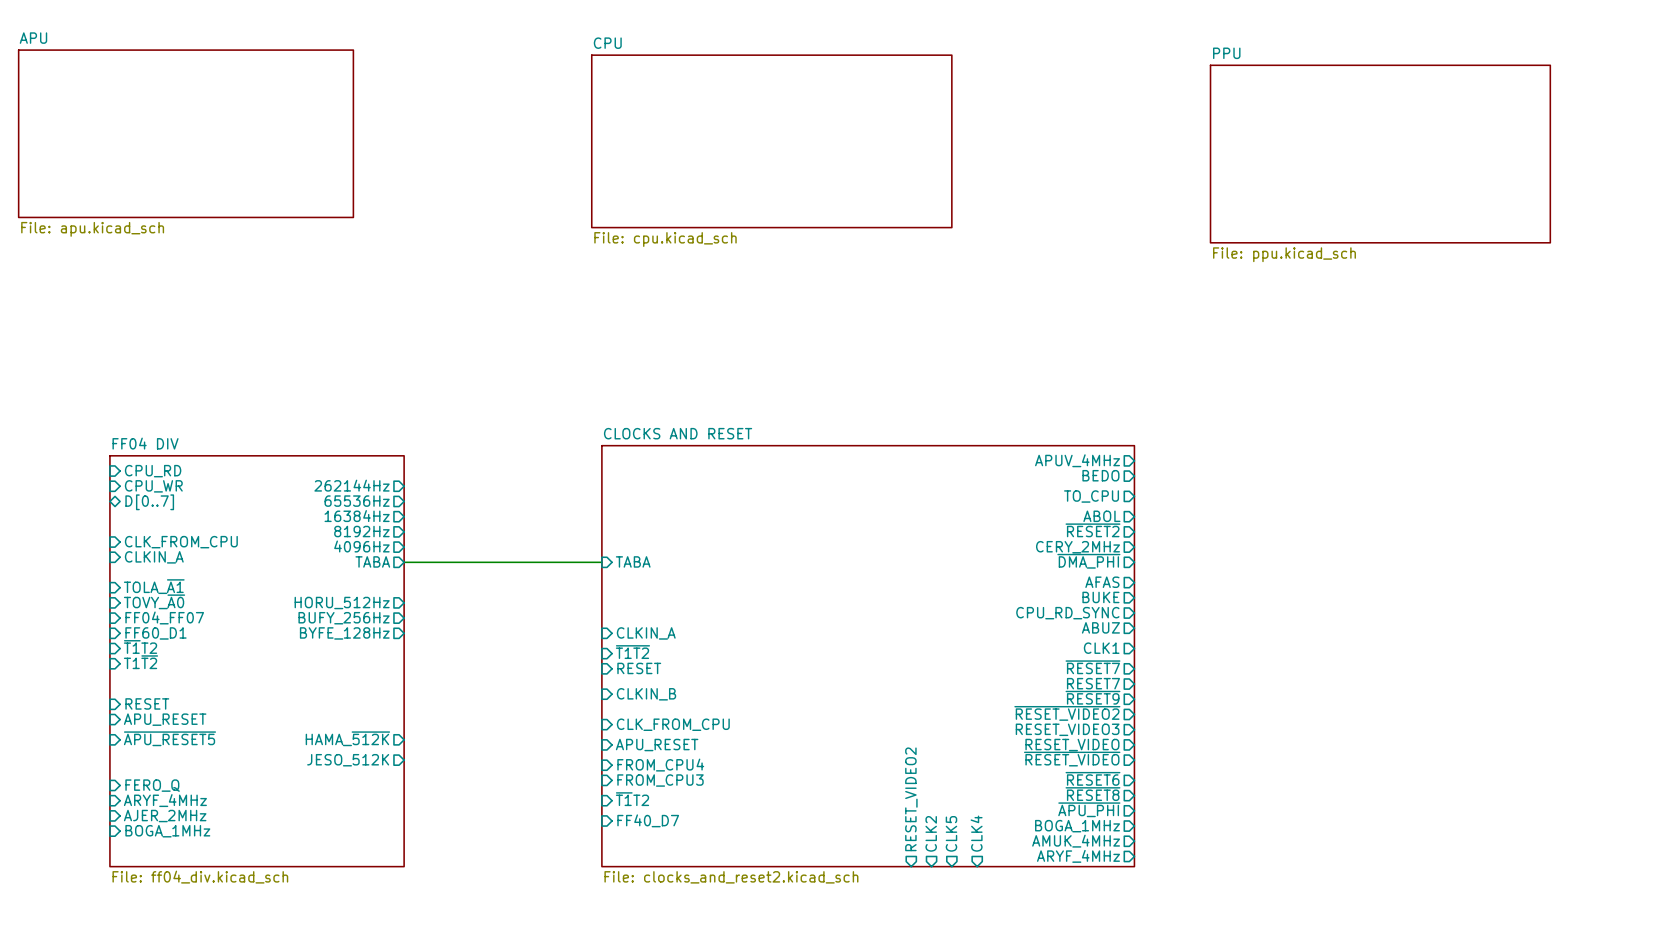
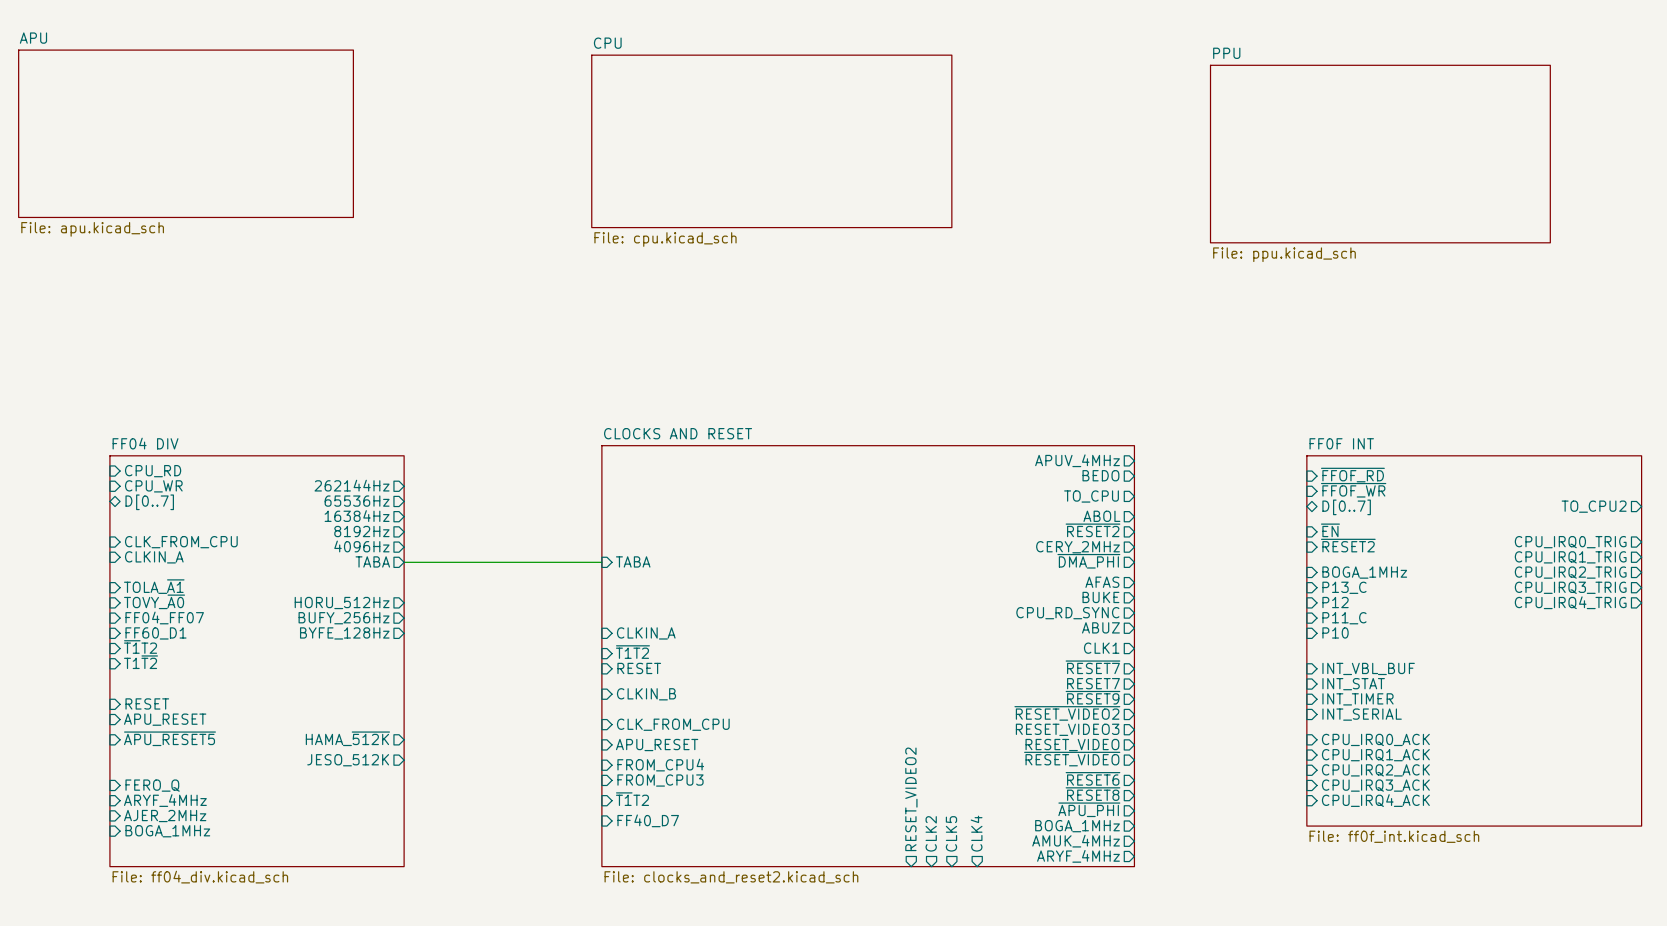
sheet pin: none -> ~{FFOF_RD} (1352, 475)
sheet pin: none -> ~{FFOF_WR} (1353, 490)
sheet pin: none -> TO_CPU2 (1594, 506)
sheet pin: none -> D[0..7] (1346, 507)
sheet pin: none -> ~{EN} (1330, 530)
sheet pin: none -> CPU_IRQ0_TRIG (1570, 542)
sheet pin: none -> ~{RESET2} (1348, 545)
sheet pin: none -> CPU_IRQ1_TRIG (1570, 557)
sheet pin: none -> BOGA_1MHz (1364, 572)
sheet pin: none -> CPU_IRQ2_TRIG (1570, 572)
sheet pin: none -> P13_C (1344, 587)
sheet pin: none -> CPU_IRQ3_TRIG (1570, 587)
sheet pin: none -> P12 (1335, 602)
sheet pin: none -> CPU_IRQ4_TRIG (1570, 602)
sheet pin: none -> P11_C (1344, 618)
sheet pin: none -> P10 (1335, 632)
sheet FF0F INT: none -> File: ff0f_int.kicad_sch (1474, 640)
sheet pin: none -> INT_VBL_BUF (1368, 668)
sheet pin: none -> INT_STAT (1353, 684)
sheet pin: none -> INT_TIMER (1357, 699)
sheet pin: none -> INT_SERIAL (1362, 714)
sheet pin: none -> CPU_IRQ0_ACK (1375, 739)
sheet pin: none -> CPU_IRQ1_ACK (1375, 755)
sheet pin: none -> CPU_IRQ2_ACK (1375, 770)
sheet pin: none -> CPU_IRQ3_ACK (1375, 785)
sheet pin: none -> CPU_IRQ4_ACK (1375, 800)

